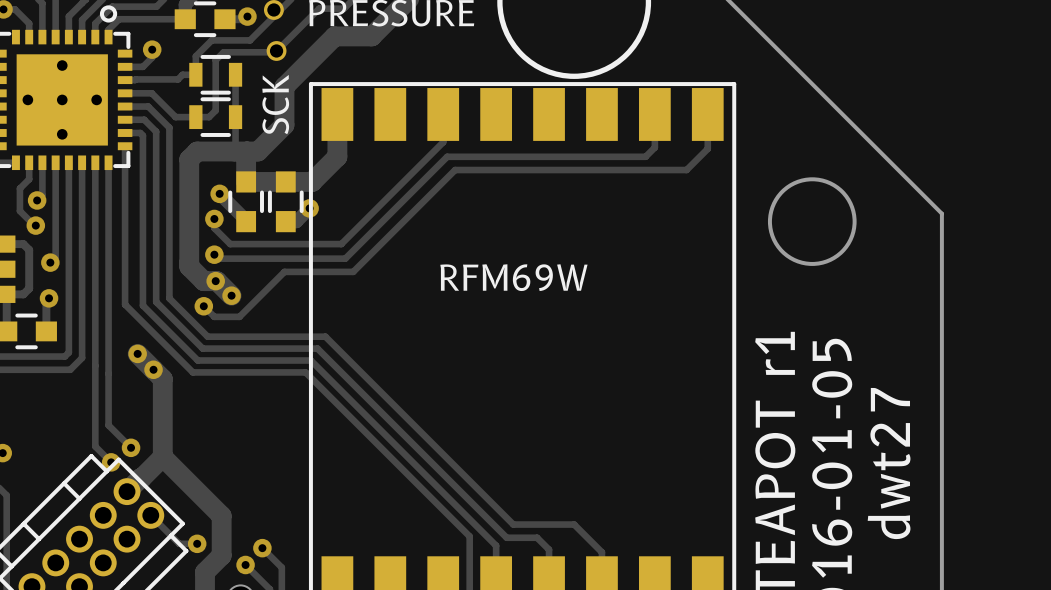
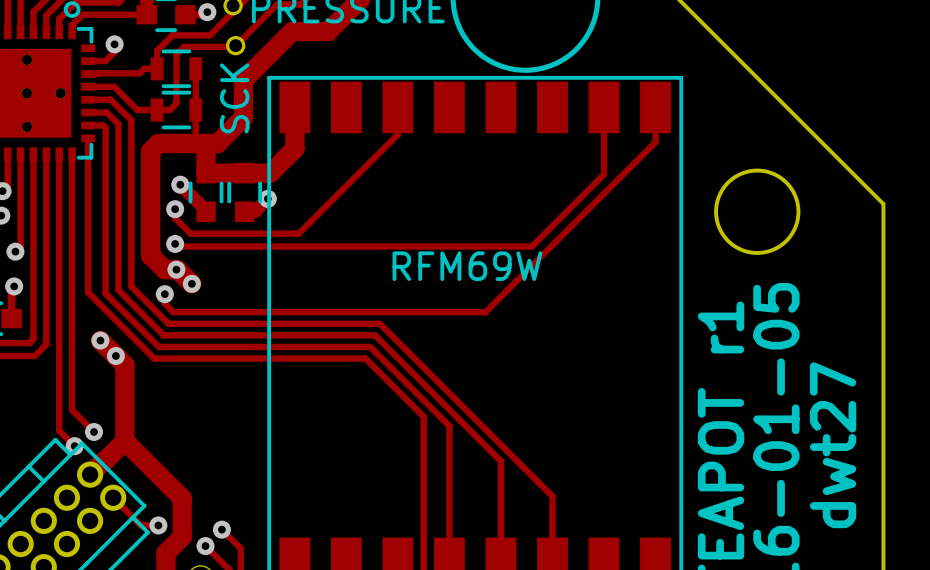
track: (654, 147) (645, 156) (447, 156) (345, 258) (217, 257) -> (603, 139) (603, 174) (531, 246) (177, 246)
track: (707, 148) (686, 170) (455, 170) (353, 271) (284, 271) (239, 316) (214, 316) (203, 306) -> (655, 140) (485, 312) (173, 312) (164, 303) (164, 294)
track: (325, 336) (513, 524) (574, 524) (601, 552) -> (283, 323) (379, 323) (552, 496) (552, 533)
track: (317, 348) (506, 537) (537, 537) (549, 549) -> (275, 335) (375, 335) (500, 461) (500, 531)
track: (310, 360) (496, 545) -> (269, 346) (370, 346) (449, 426) (449, 527)
track: (305, 372) (469, 536) -> (264, 358) (365, 358) (423, 416) (423, 518)

